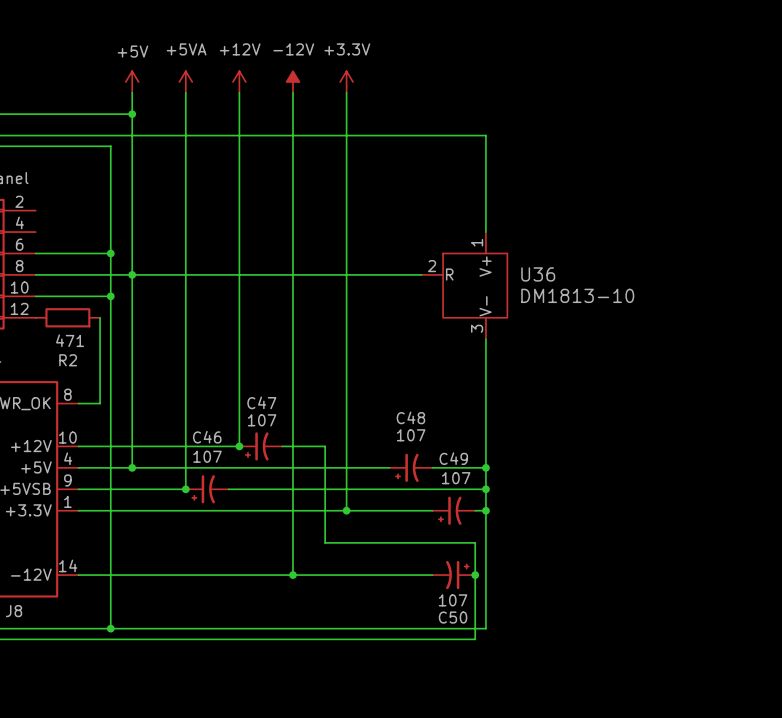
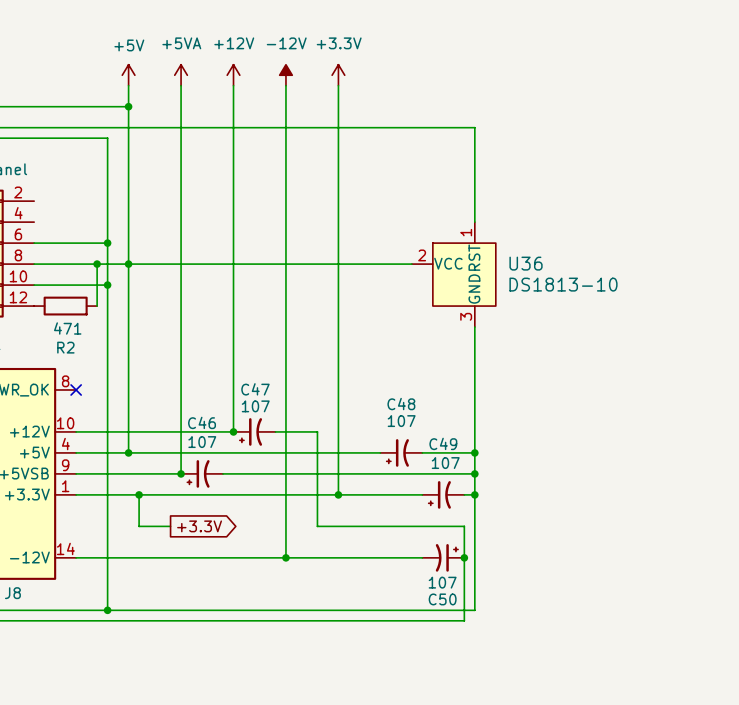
U36 pin name: V+ (485, 266) -> RST (474, 257)
junction: none -> (97, 264)
U36 pin name: R (449, 274) -> VCC (448, 263)
U36 value: DM1813-10 (577, 295) -> DS1813-10 (563, 284)
U36 pin name: V- (485, 306) -> GND (474, 289)
wire: (100, 317) (100, 403) (78, 403) -> (97, 306) (97, 264)
no-connect mark: none -> (76, 389)
wire: none -> (139, 494) (139, 526) (170, 526)
junction: none -> (139, 494)
global label: none -> +3.3V (199, 526)

